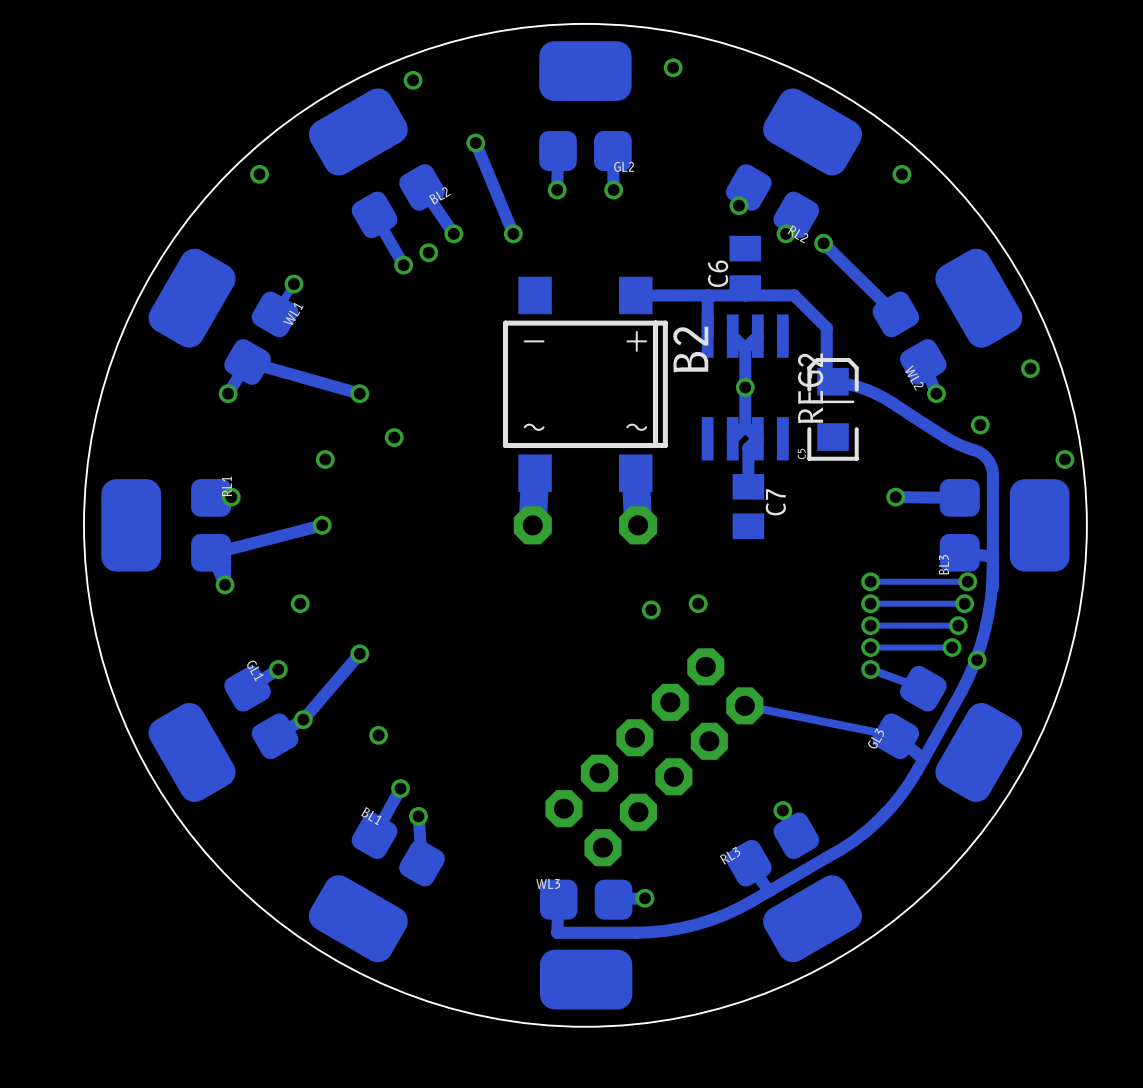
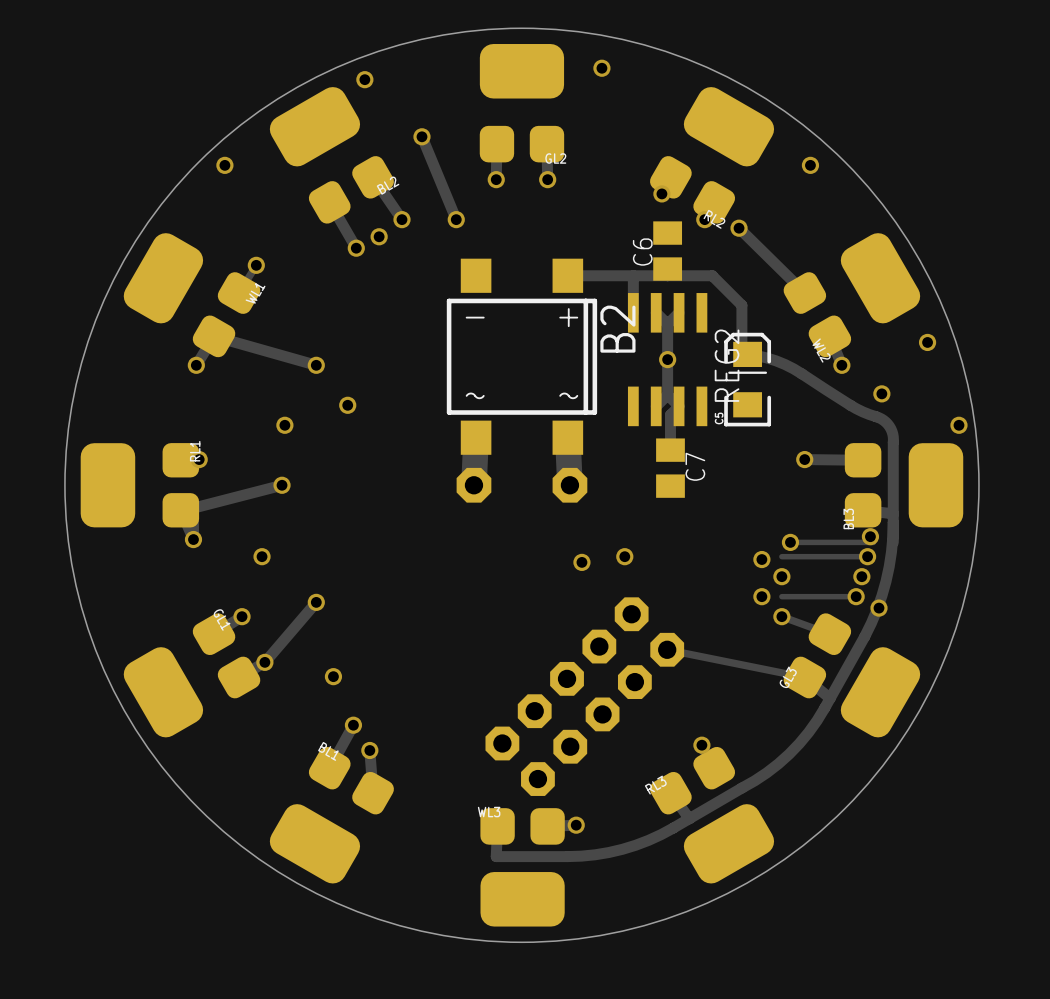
via: (870, 581) -> none
track: (967, 581) (870, 581) -> none
track: none -> (873, 539) (873, 542) (790, 542)
via: none -> (790, 542)
via: (870, 603) -> none
via: none -> (761, 559)
track: (958, 625) (870, 625) -> none
via position: (870, 647) -> (761, 596)

